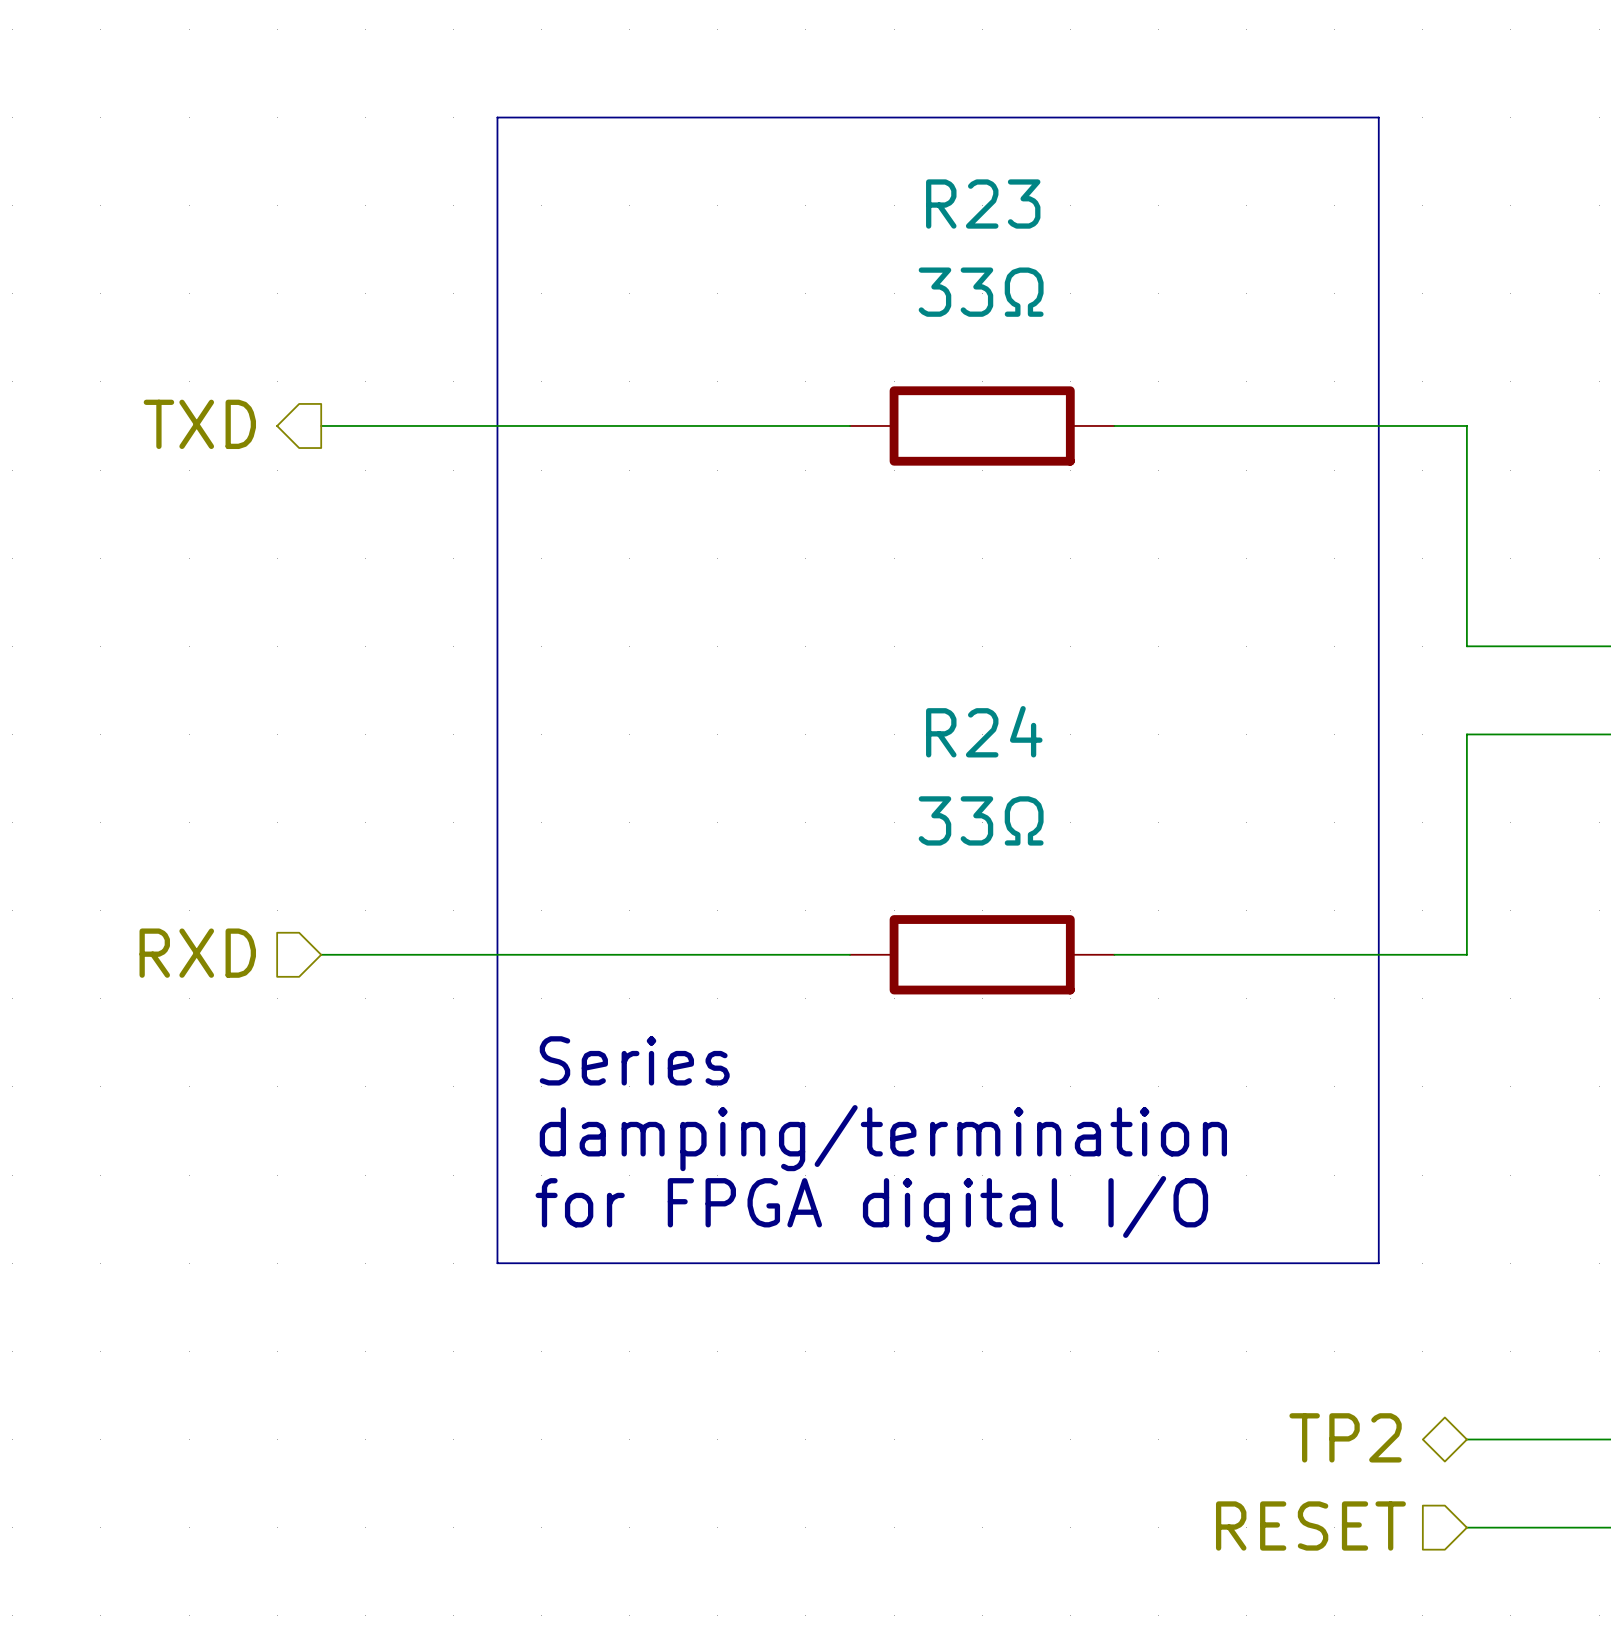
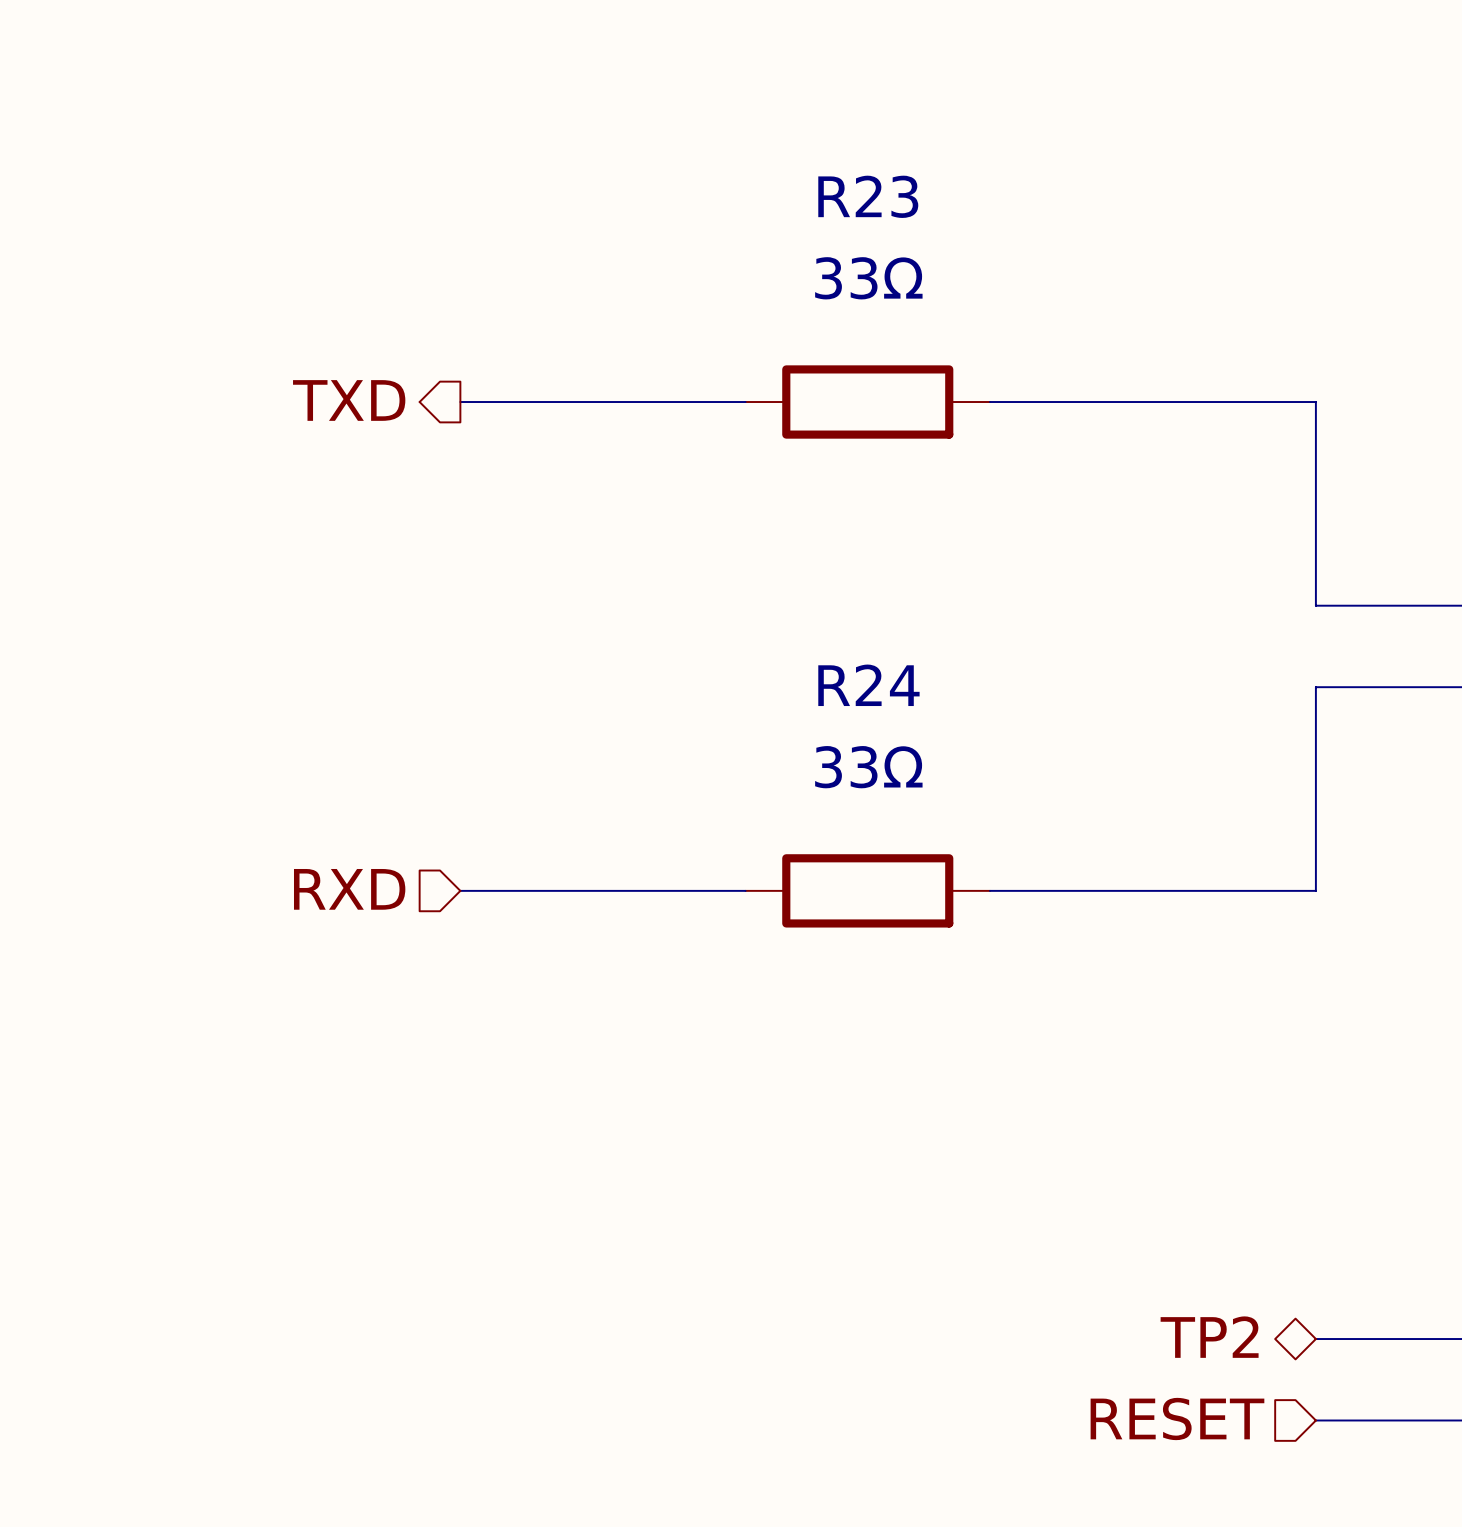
line: (497, 117) (1378, 117) (1378, 1263) (497, 1263) (497, 117) -> none
hierarchical label position: TXD (199, 424) -> TXD (349, 400)
wire: (321, 425) (541, 425) -> none
hierarchical label position: RXD (197, 953) -> RXD (349, 889)
wire: (321, 954) (541, 954) -> none
text: Series (634, 1060) -> none
text: damping/termination (883, 1138) -> none
text: for FPGA digital I/O (871, 1209) -> none

